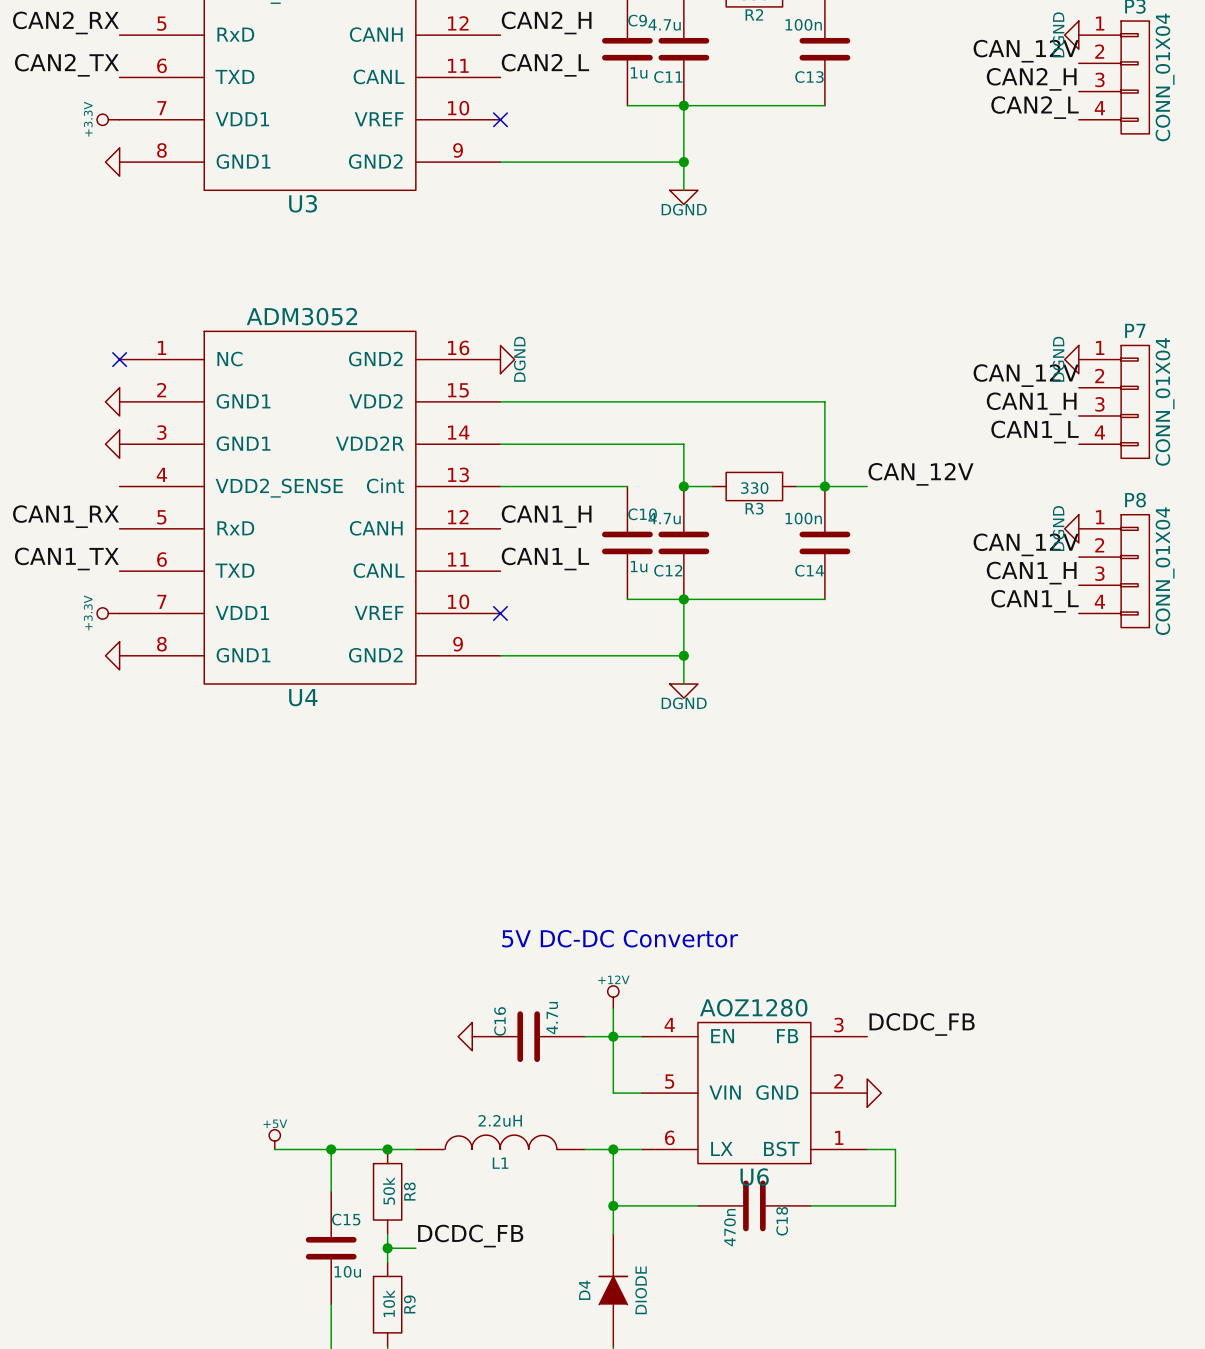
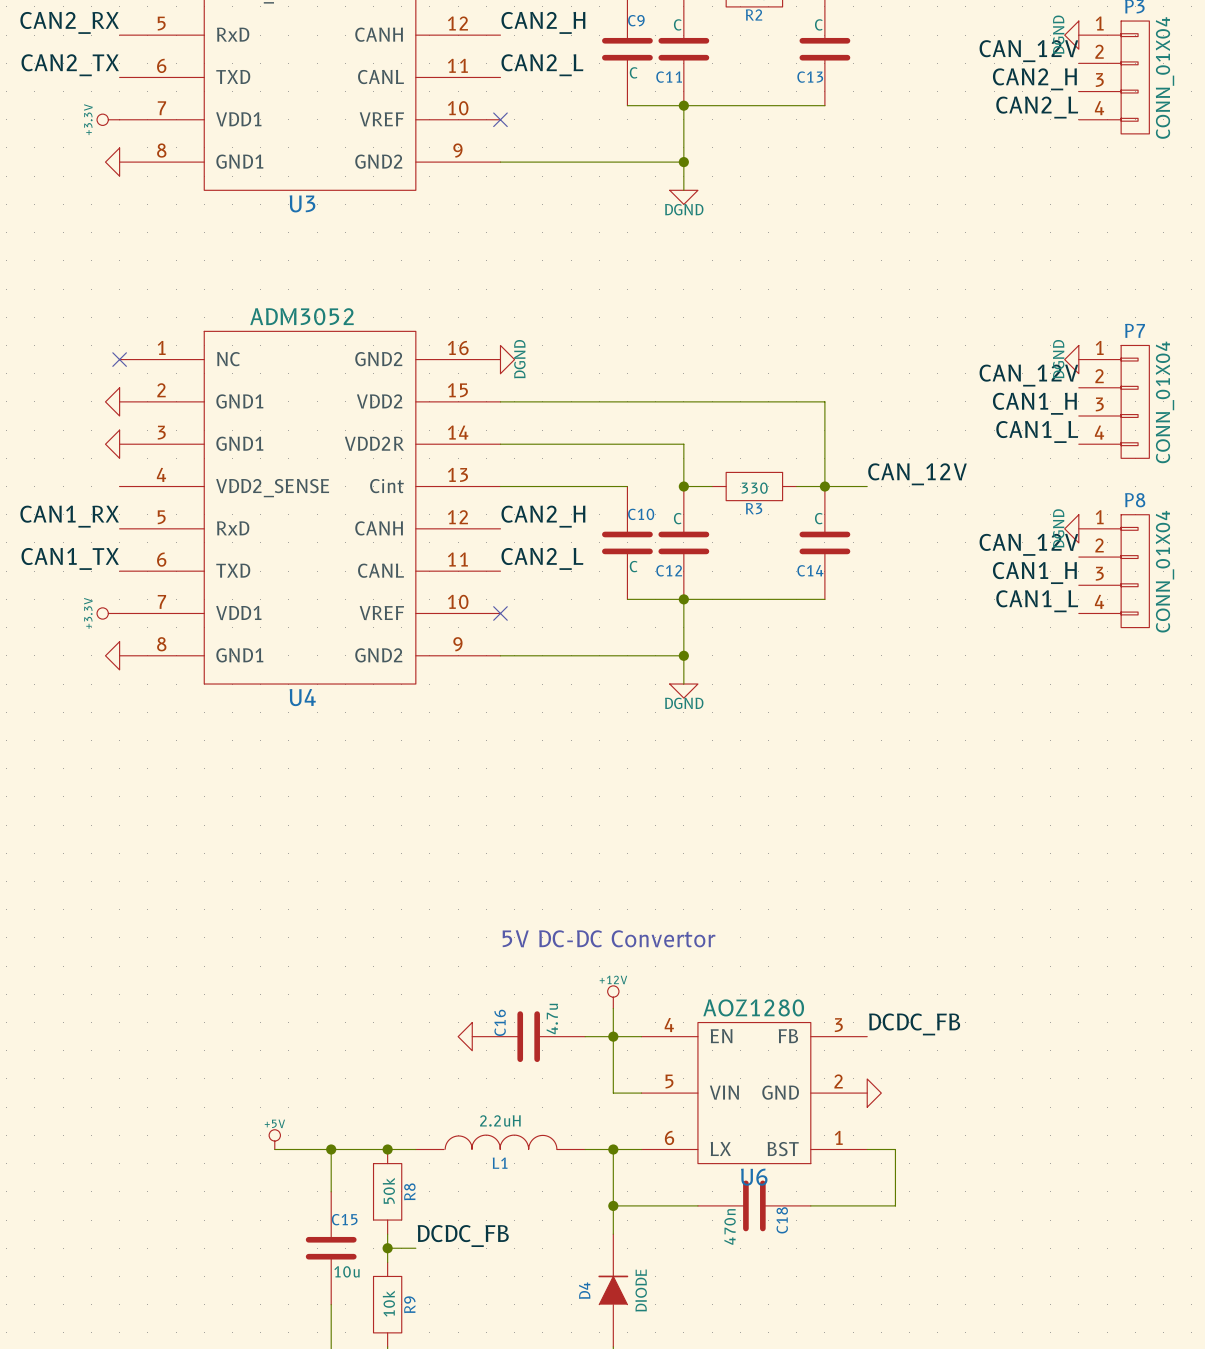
C11 value: 4.7u (664, 24) -> C (677, 24)
C13 value: 100n (803, 24) -> C (818, 24)
C9 value: 1u (639, 72) -> C (633, 72)
label: CAN1_H (546, 516) -> CAN2_H (543, 516)
C12 value: 4.7u (664, 518) -> C (677, 518)
C14 value: 100n (803, 518) -> C (818, 518)
label: CAN1_L (545, 558) -> CAN2_L (542, 558)
C10 value: 1u (639, 566) -> C (633, 566)

